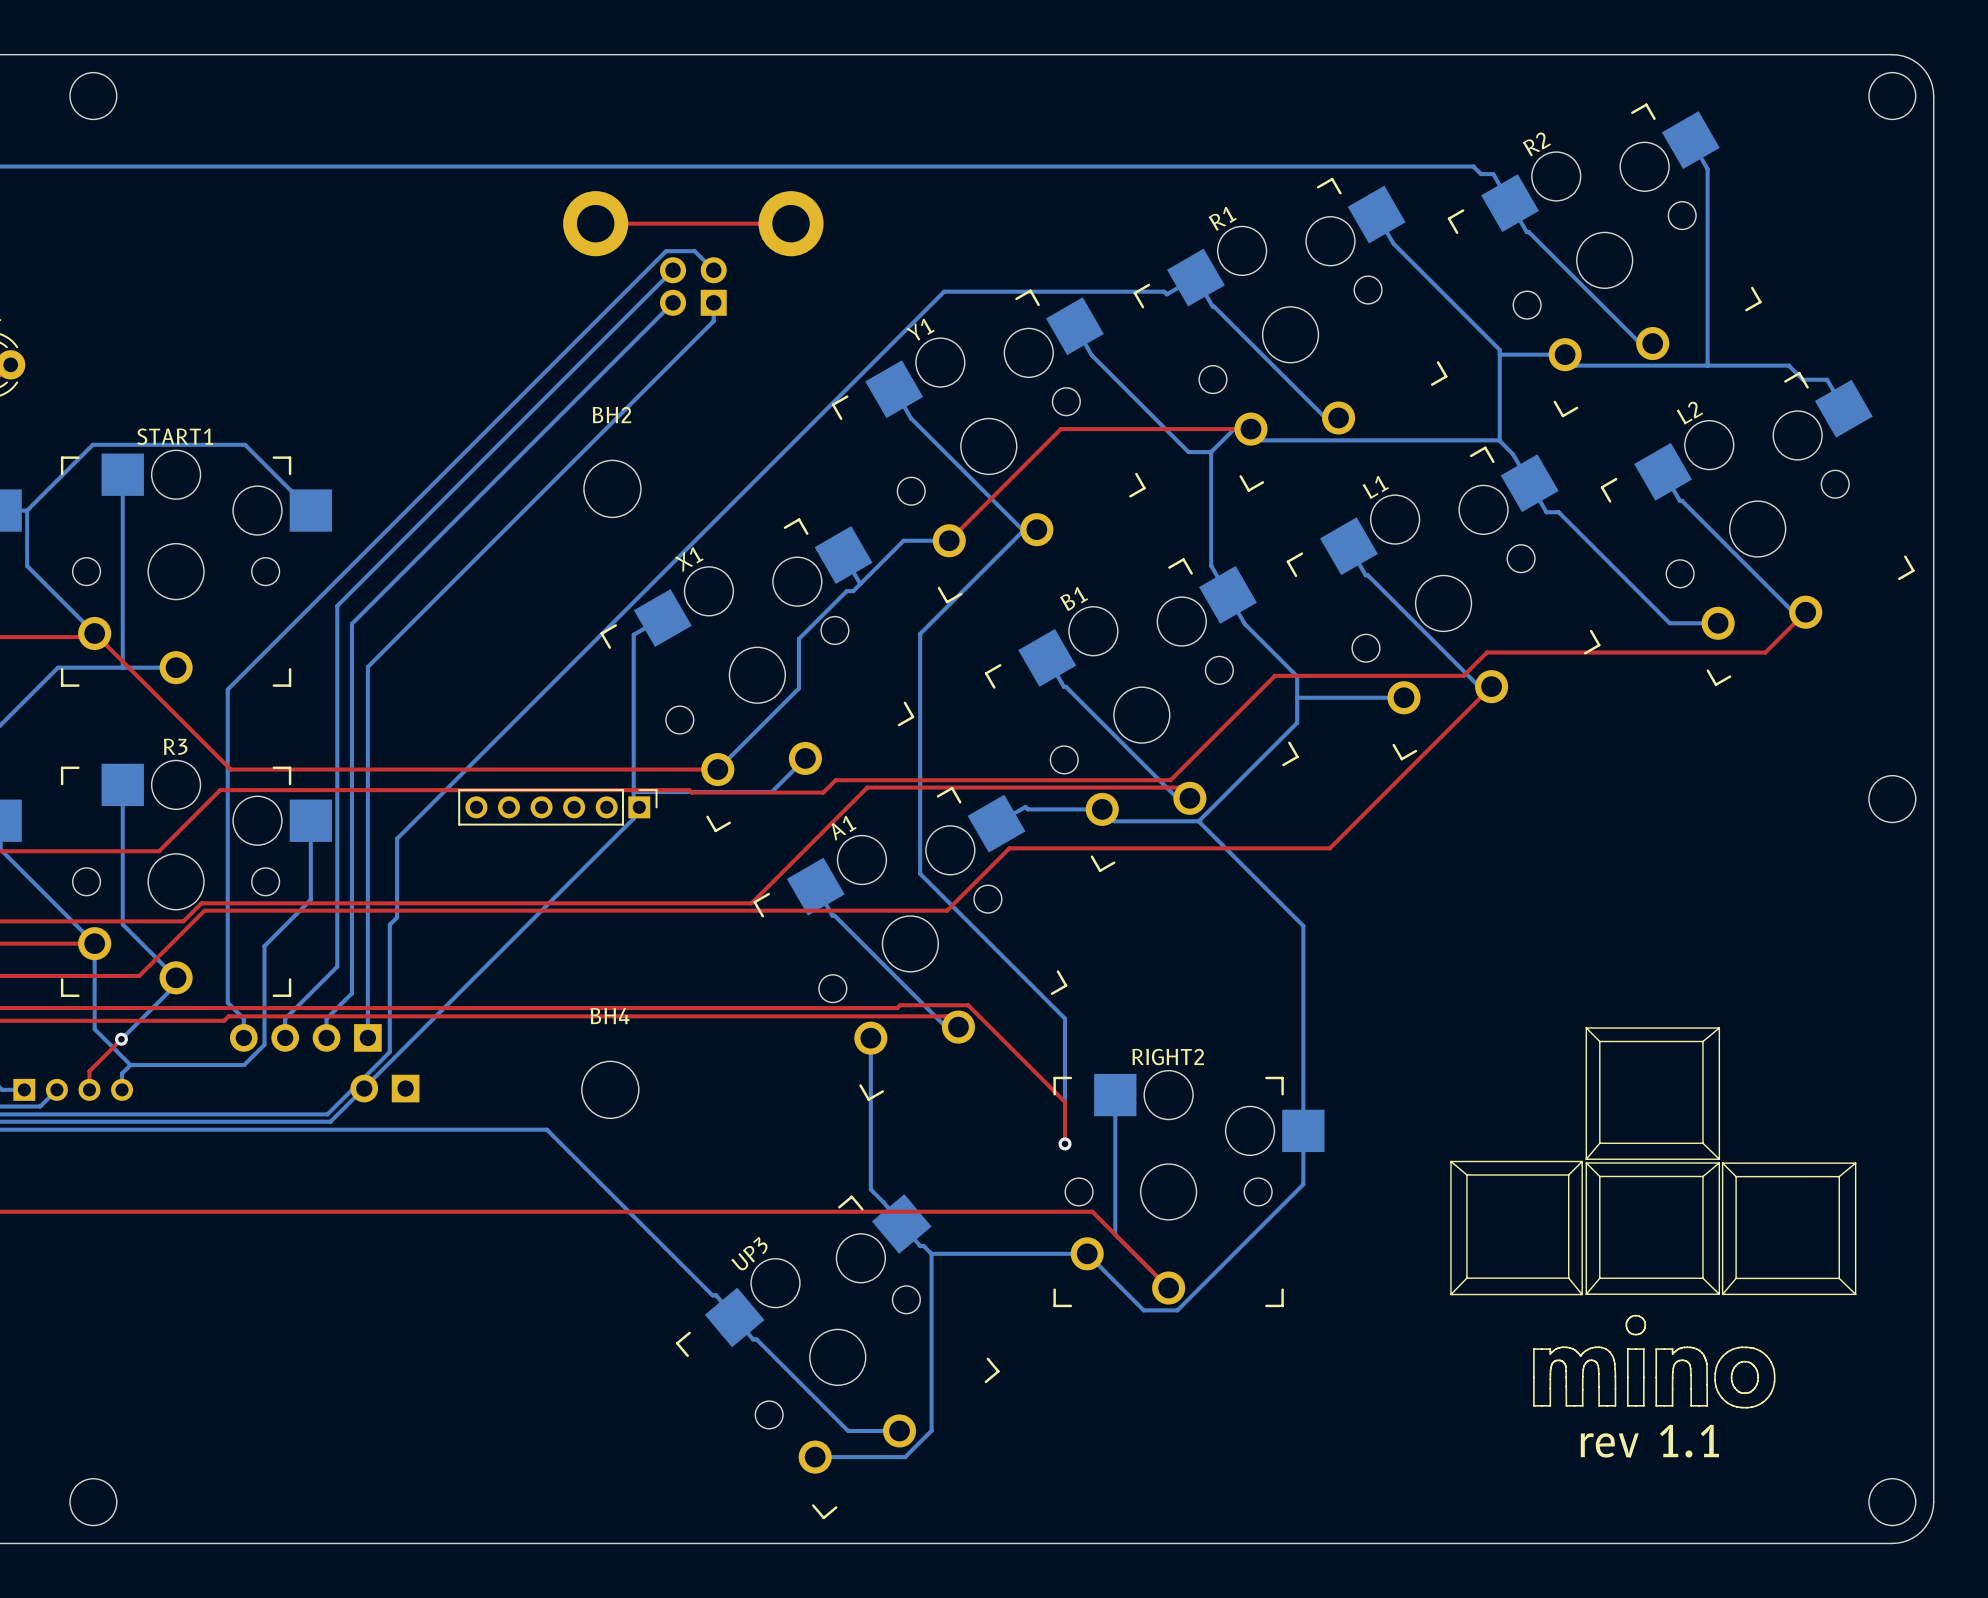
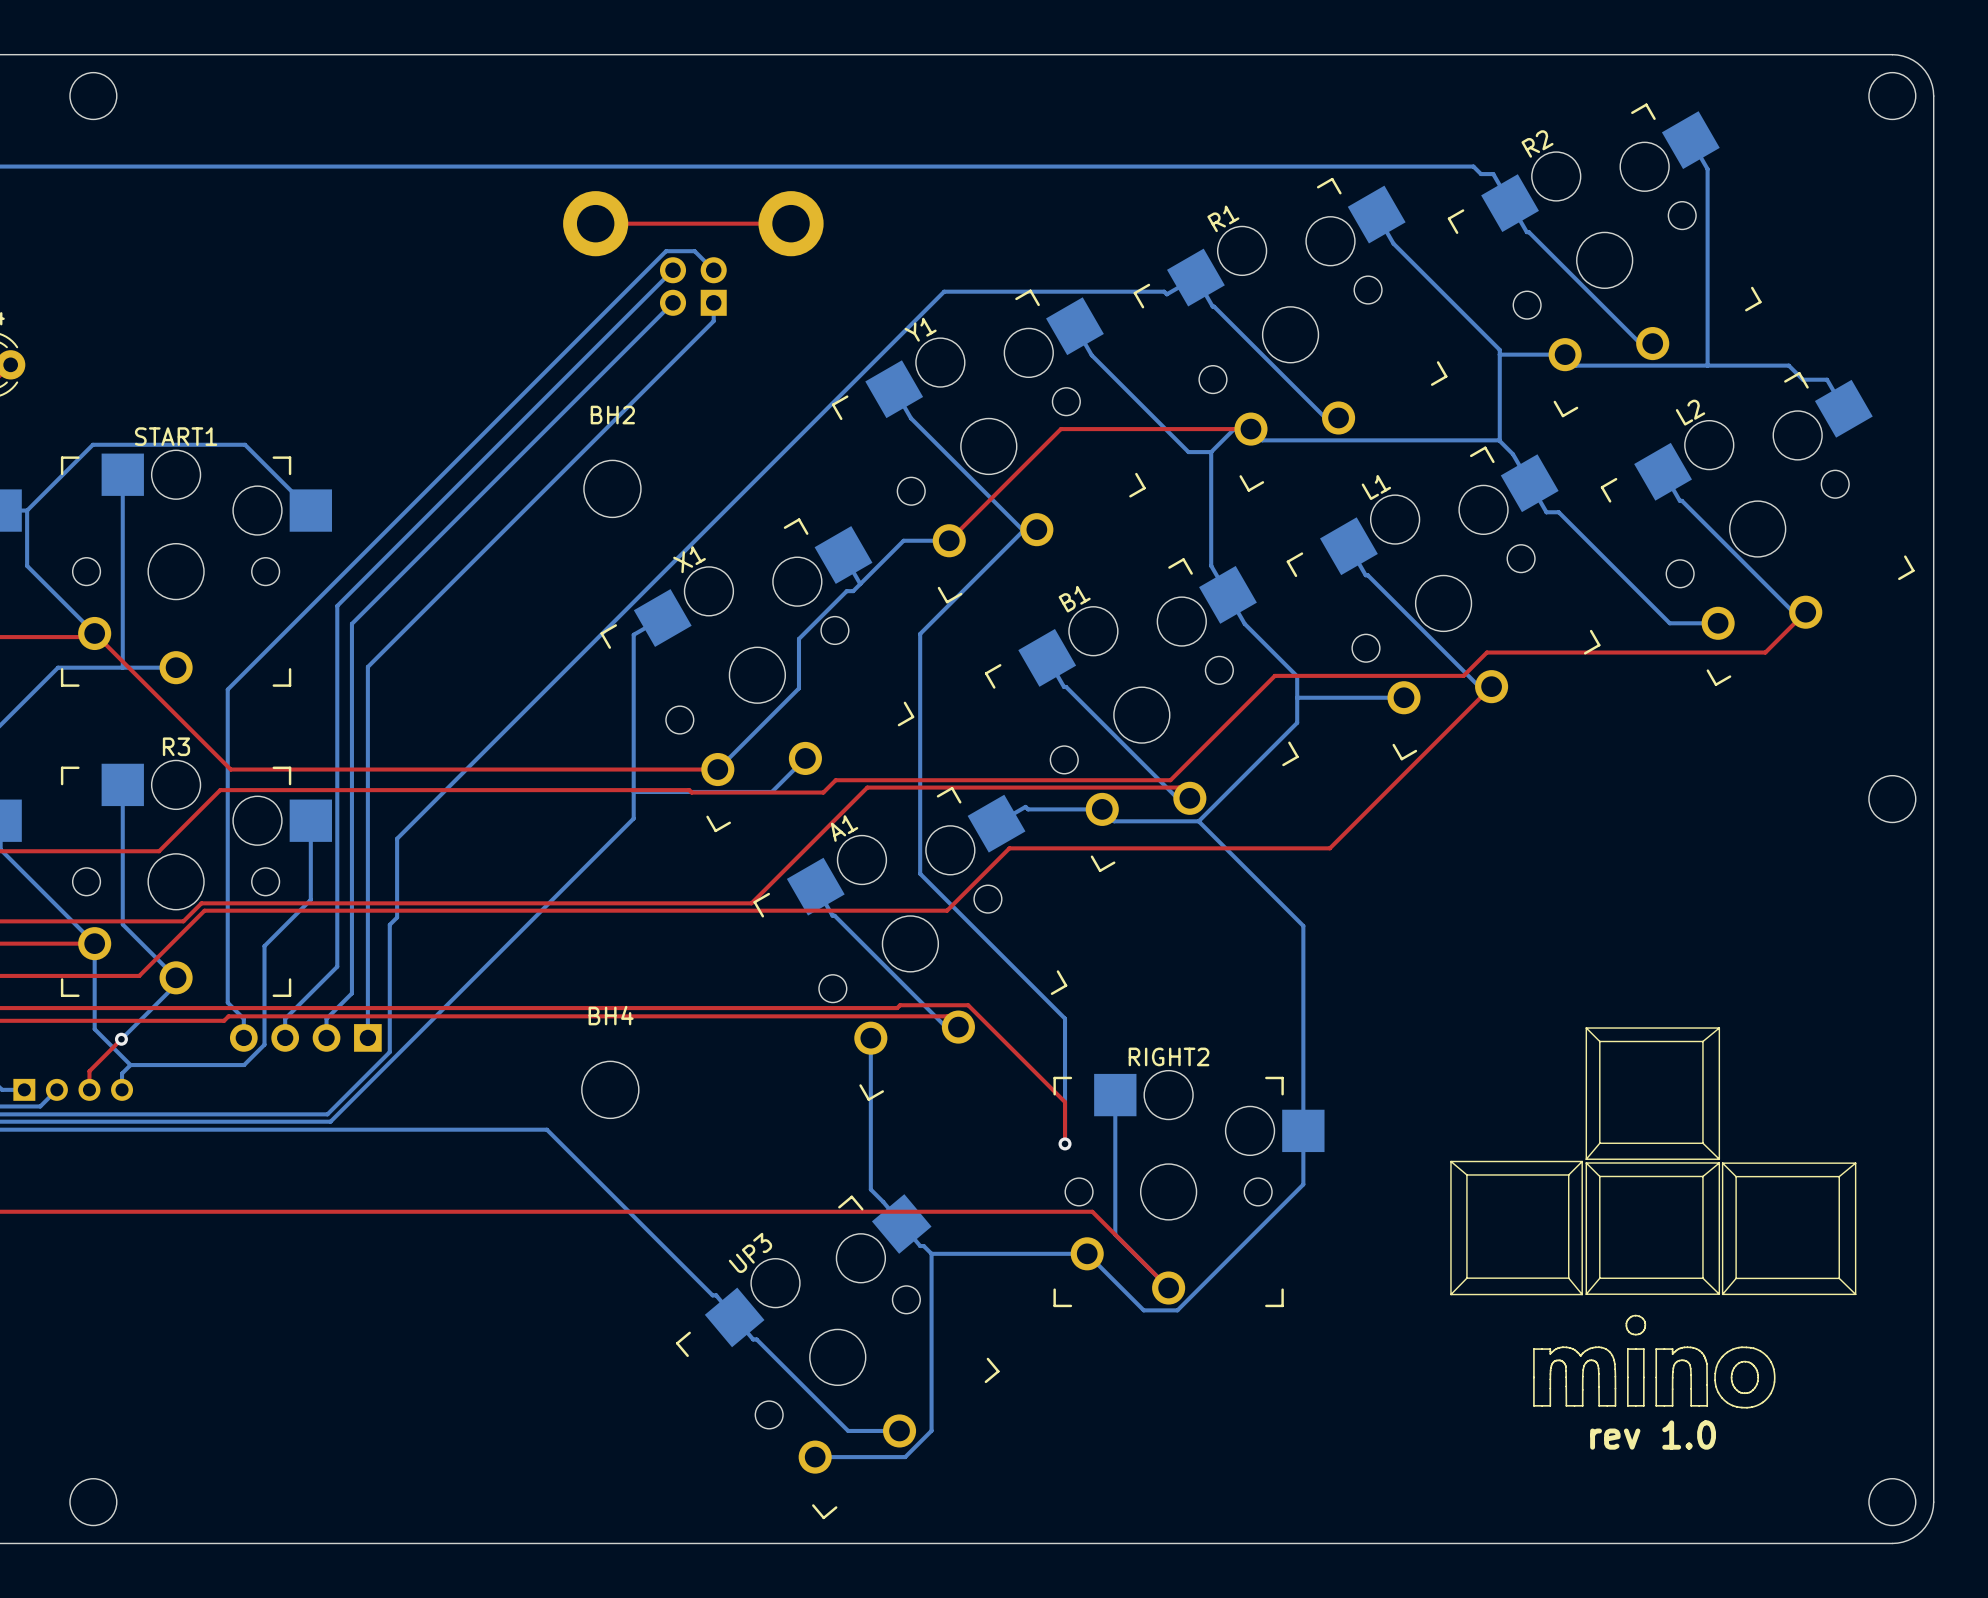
part: (557, 807) -> none
part: (384, 1088) -> none
text: rev 1.1 (1649, 1441) -> rev 1.0 (1653, 1435)

